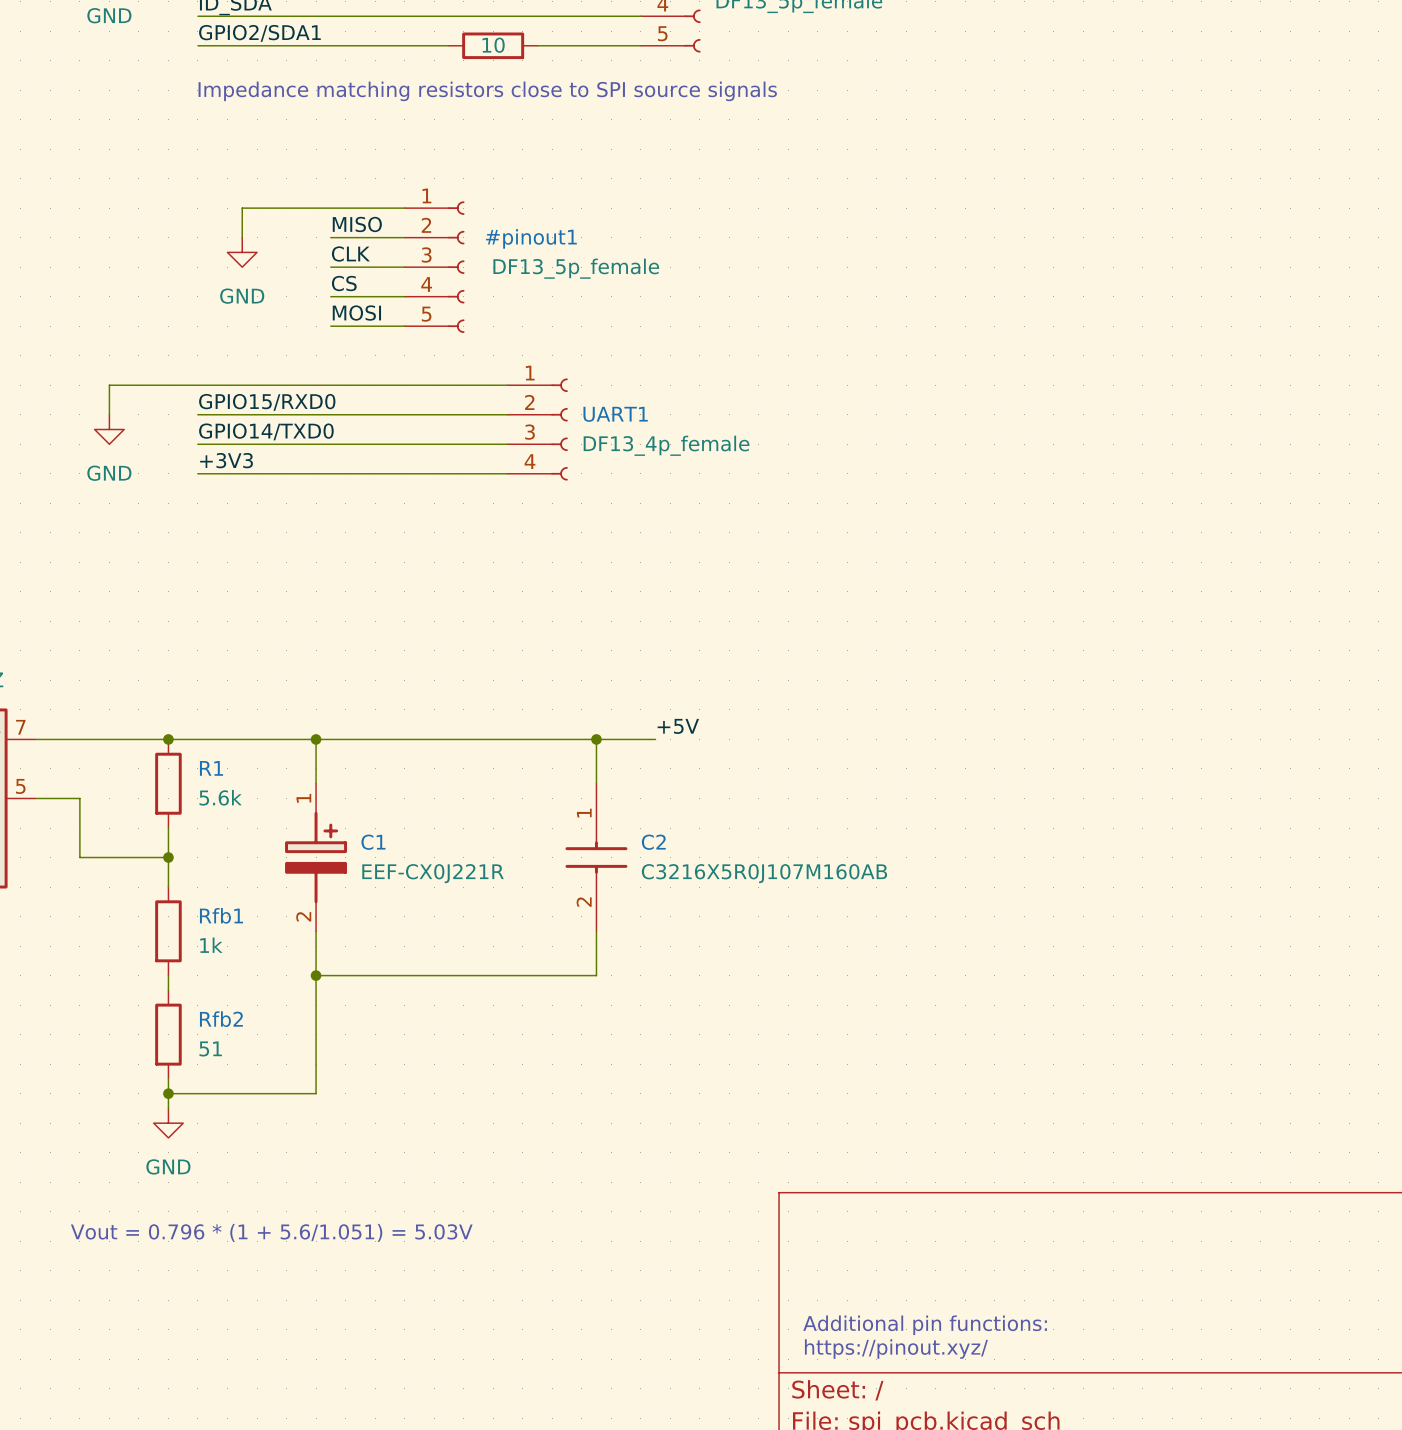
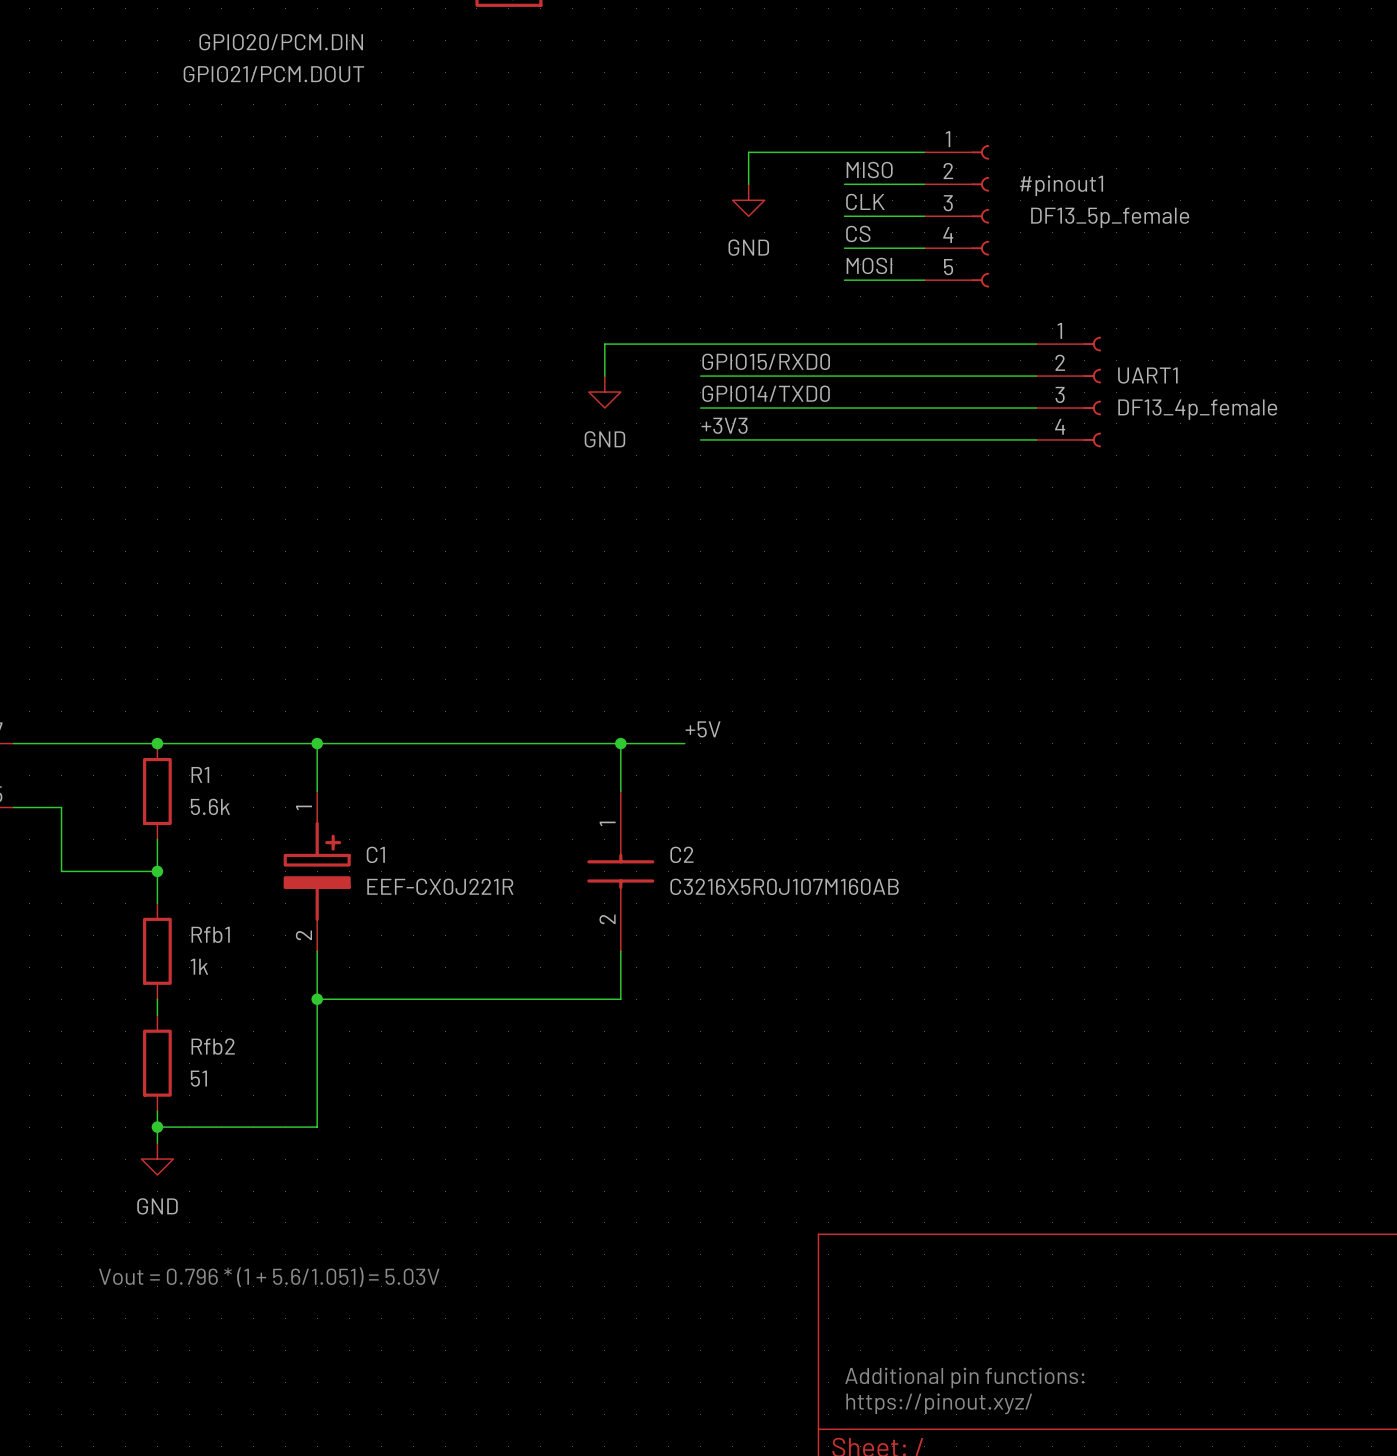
text: Impedance matching resistors close to SPI source signals (487, 91) -> none
label: none -> GPIO20/PCM.DIN (281, 42)
label: none -> GPIO21/PCM.DOUT (273, 74)
wire: none -> (924, 152) (748, 152) (748, 184)
wire: (404, 208) (242, 208) (242, 237) -> none
label: none -> MISO (869, 170)
wire: none -> (844, 184) (924, 184)
label: MISO (357, 224) -> none
wire: (330, 237) (404, 237) -> none
power symbol: none -> GND (748, 200)
label: none -> CLK (865, 202)
power symbol: GND (242, 252) -> none
wire: none -> (844, 216) (924, 216)
label: CLK (350, 254) -> none
wire: (330, 267) (404, 267) -> none
#pinout1 position: DF13_5p_female (434, 267) -> DF13_5p_female (956, 216)
label: none -> CS (858, 233)
wire: none -> (844, 248) (924, 248)
label: CS (344, 283) -> none
wire: (330, 296) (404, 296) -> none
label: none -> MOSI (869, 265)
wire: none -> (844, 280) (924, 280)
label: MOSI (356, 313) -> none
wire: (330, 326) (404, 326) -> none
wire: none -> (1036, 344) (604, 344) (604, 376)
wire: (507, 385) (109, 385) (109, 414) -> none
label: none -> GPIO15/RXD0 (766, 361)
wire: none -> (700, 376) (1036, 376)
label: GPIO15/RXD0 (267, 402) -> none
wire: (197, 414) (507, 414) -> none
power symbol: none -> GND (604, 392)
label: none -> GPIO14/TXD0 (766, 393)
power symbol: GND (109, 429) -> none
UART1 position: (537, 429) -> (1068, 392)
wire: none -> (700, 408) (1036, 408)
label: GPIO14/TXD0 (266, 431) -> none
wire: (197, 444) (507, 444) -> none
label: none -> +3V3 (724, 425)
wire: none -> (700, 439) (1036, 439)
label: +3V3 (226, 460) -> none
wire: (197, 473) (507, 473) -> none

